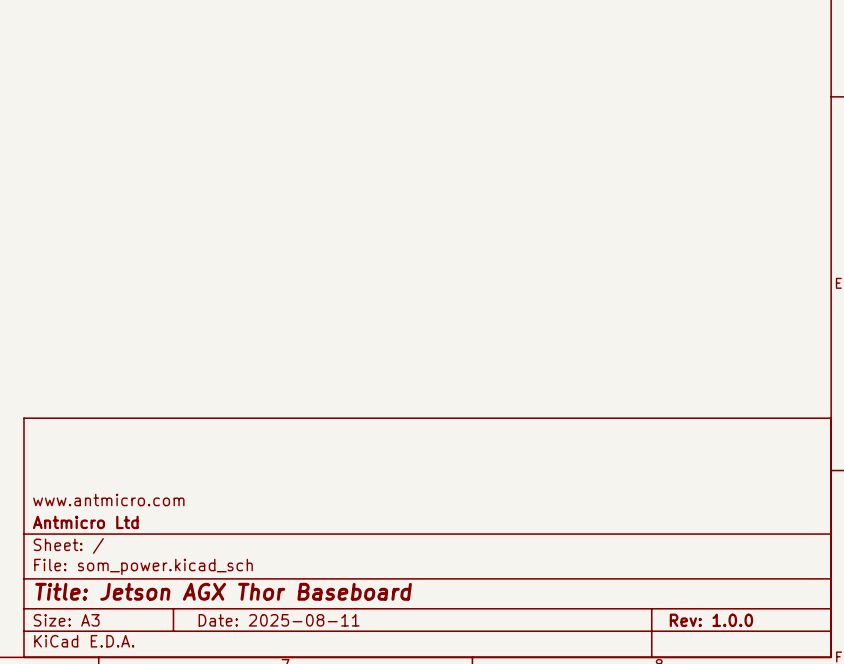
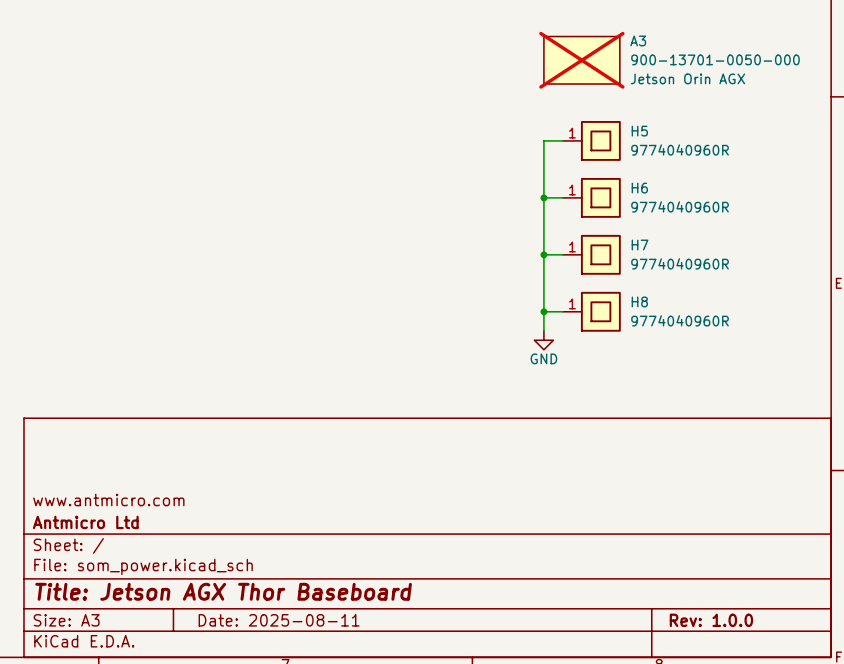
A3: none -> (581, 60)
wire: none -> (562, 140) (543, 140) (543, 330)
H5: none -> (591, 140)
wire: none -> (543, 197) (562, 197)
junction: none -> (543, 197)
H6: none -> (591, 197)
wire: none -> (543, 254) (562, 254)
junction: none -> (543, 254)
H7: none -> (591, 254)
wire: none -> (543, 311) (562, 311)
junction: none -> (543, 311)
H8: none -> (591, 311)
power symbol: none -> GND (543, 340)

